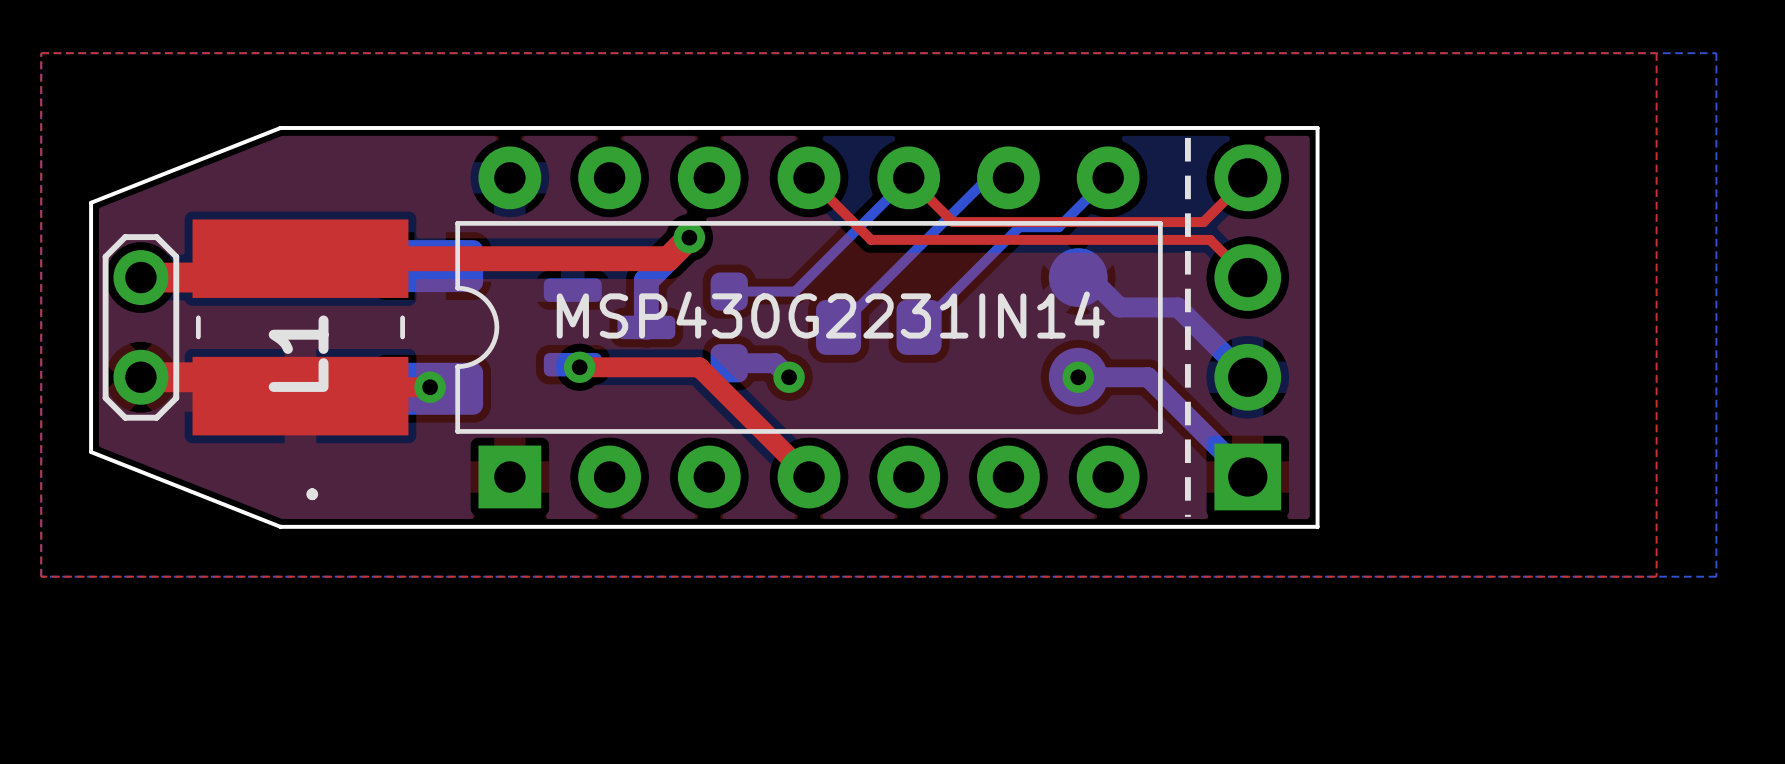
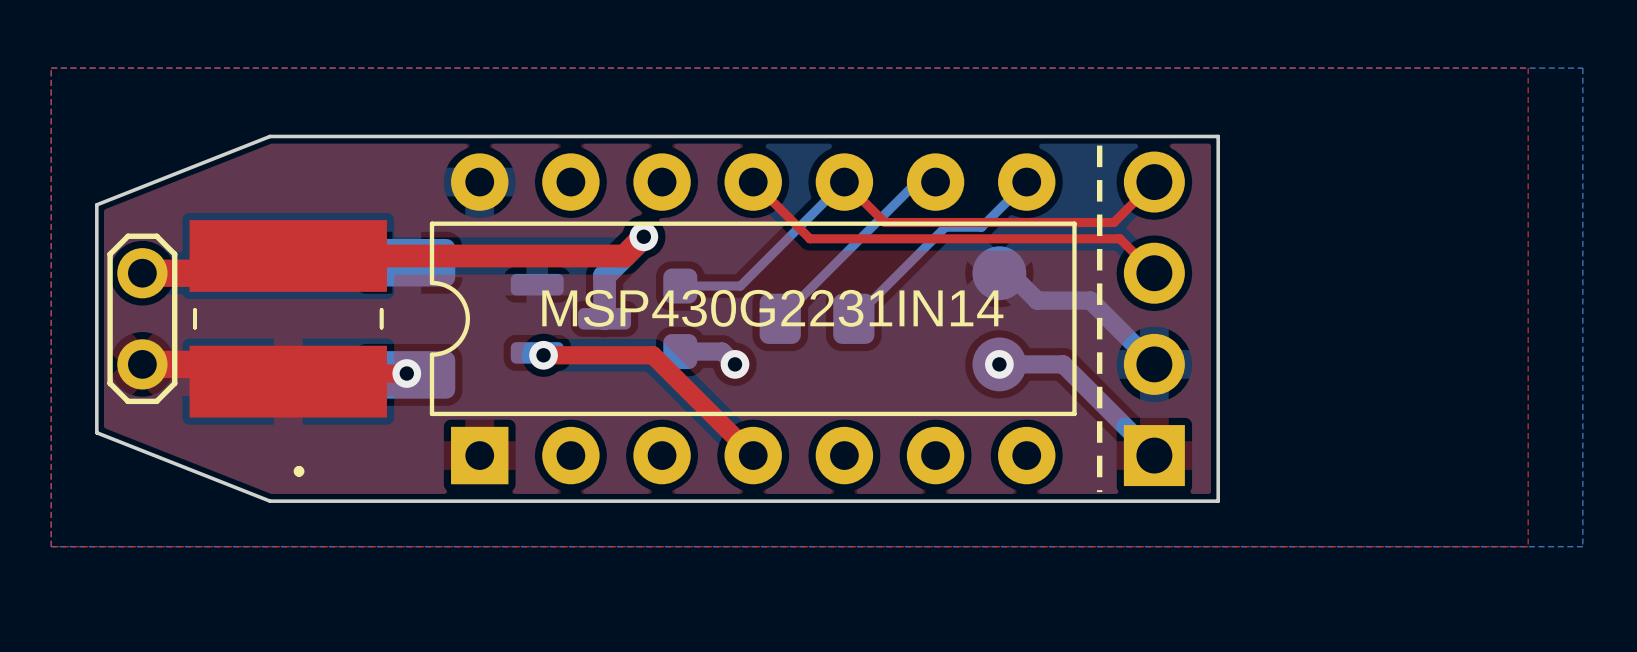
L1 name: L1 (298, 353) -> none

